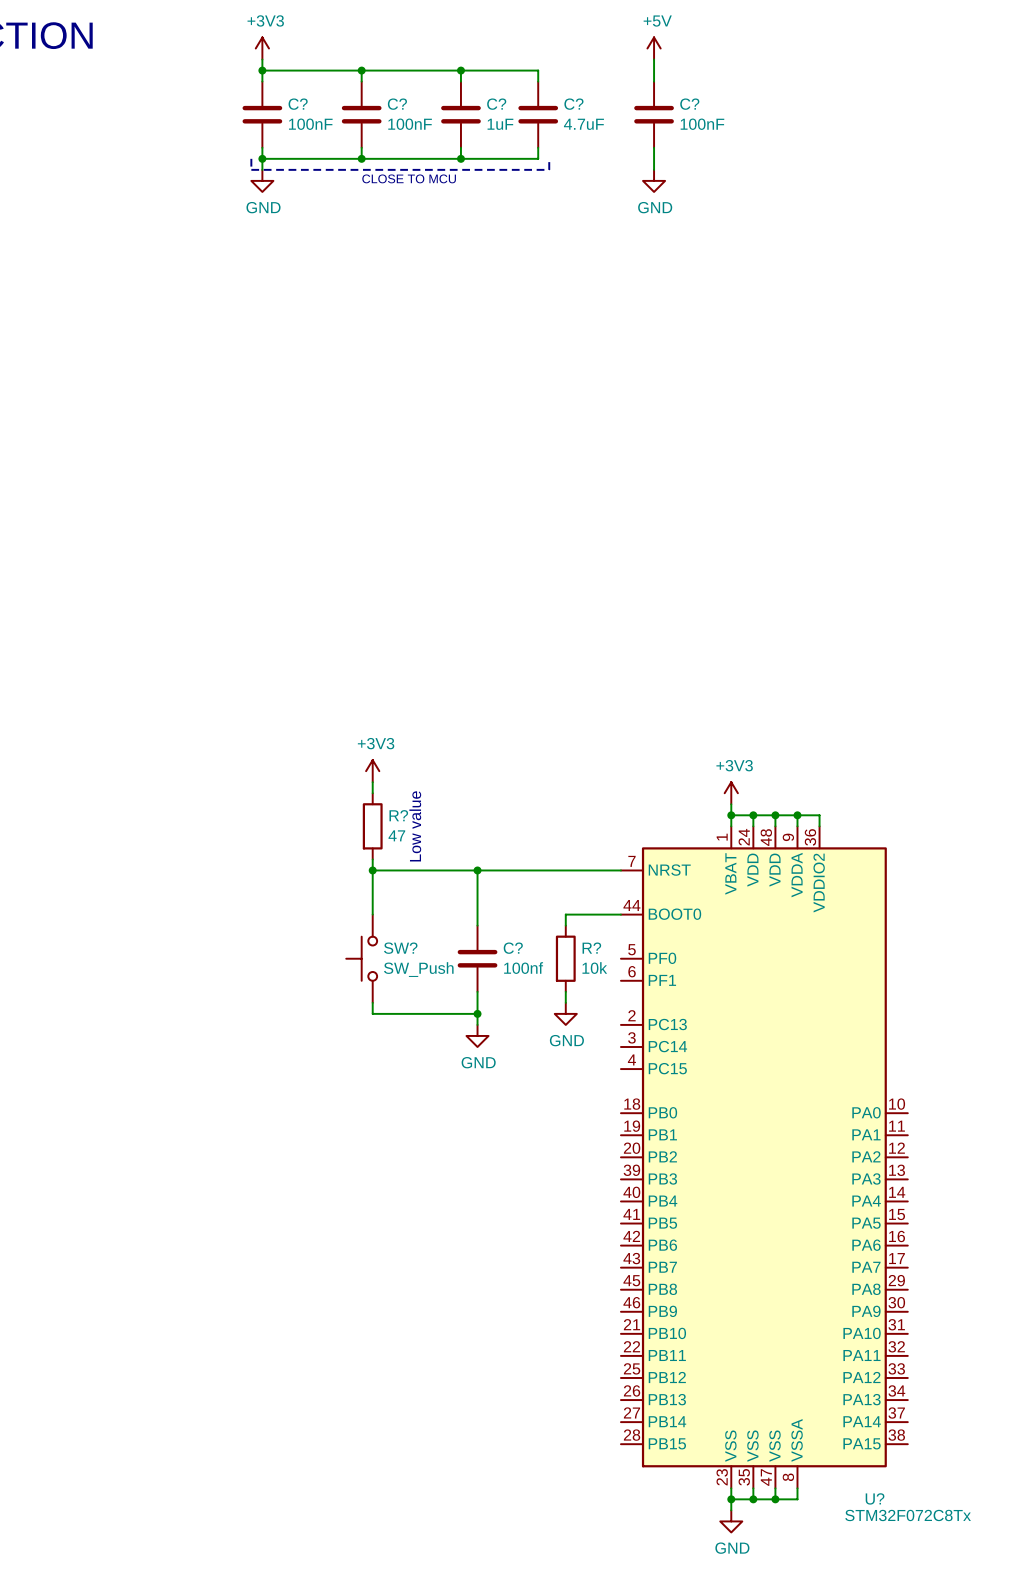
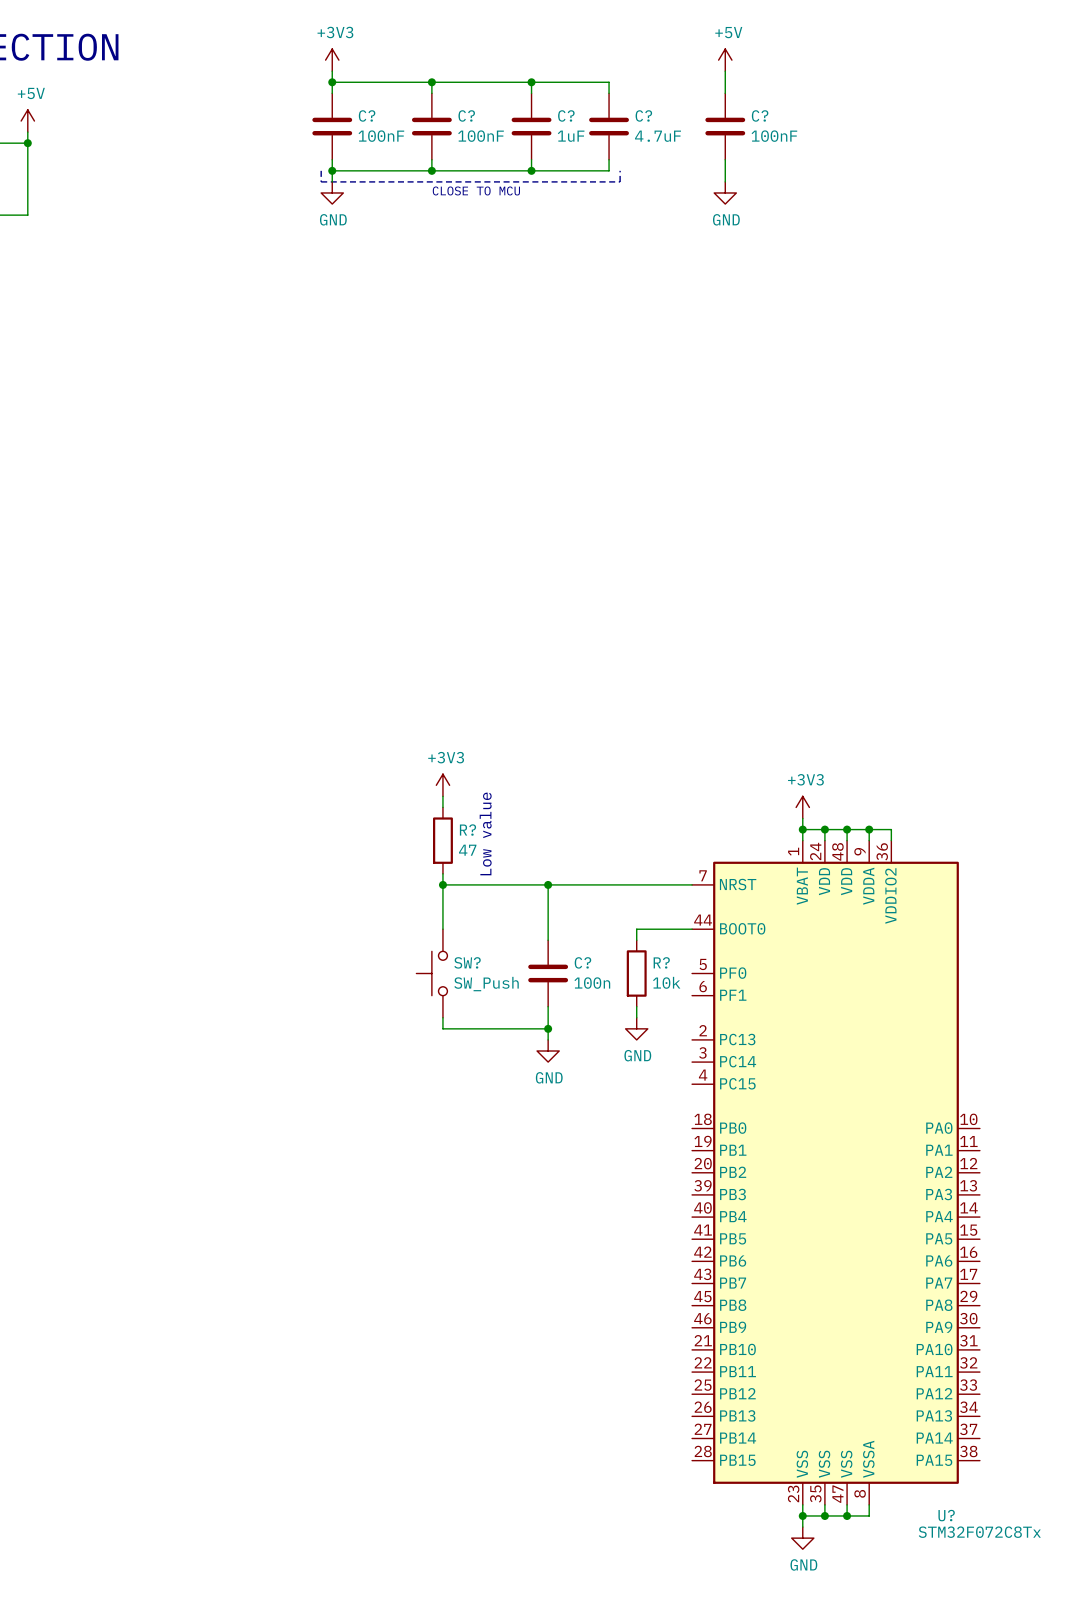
C? value: 100nf (523, 968) -> 100n (592, 983)

